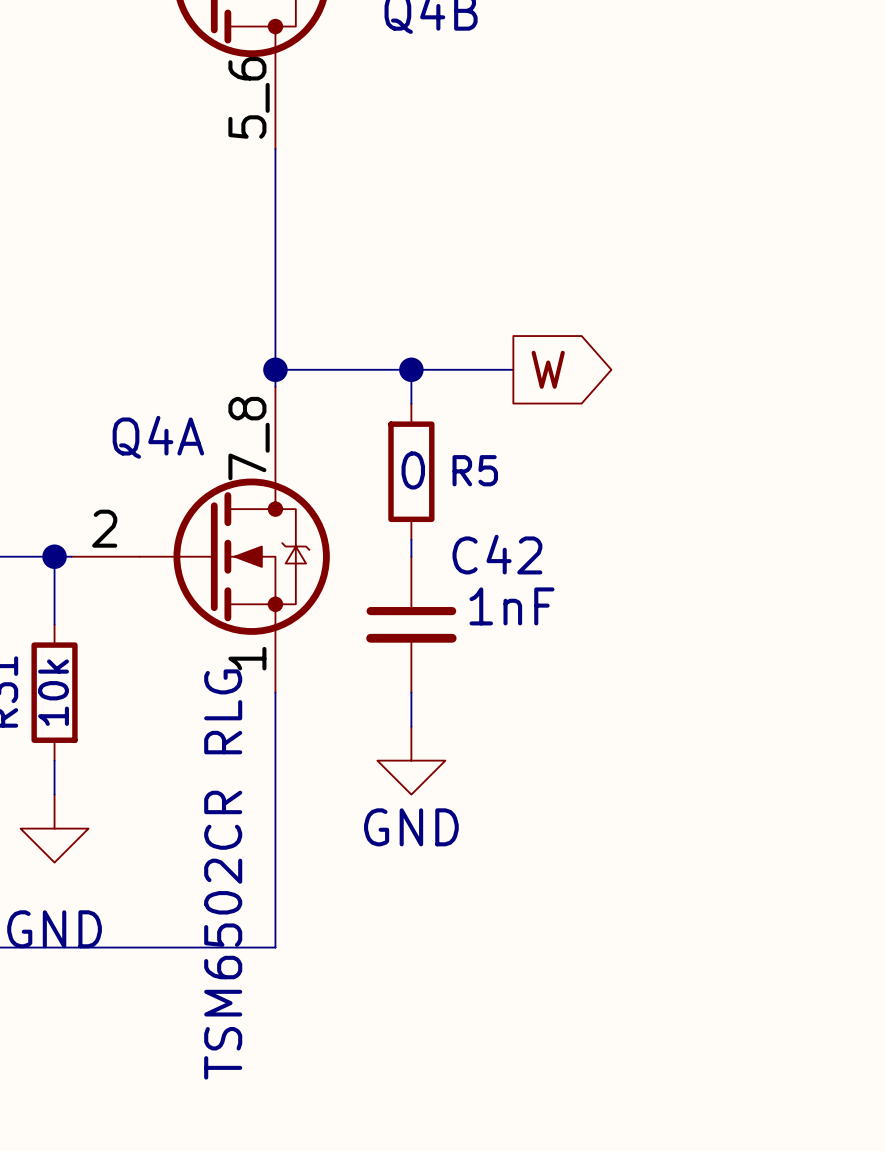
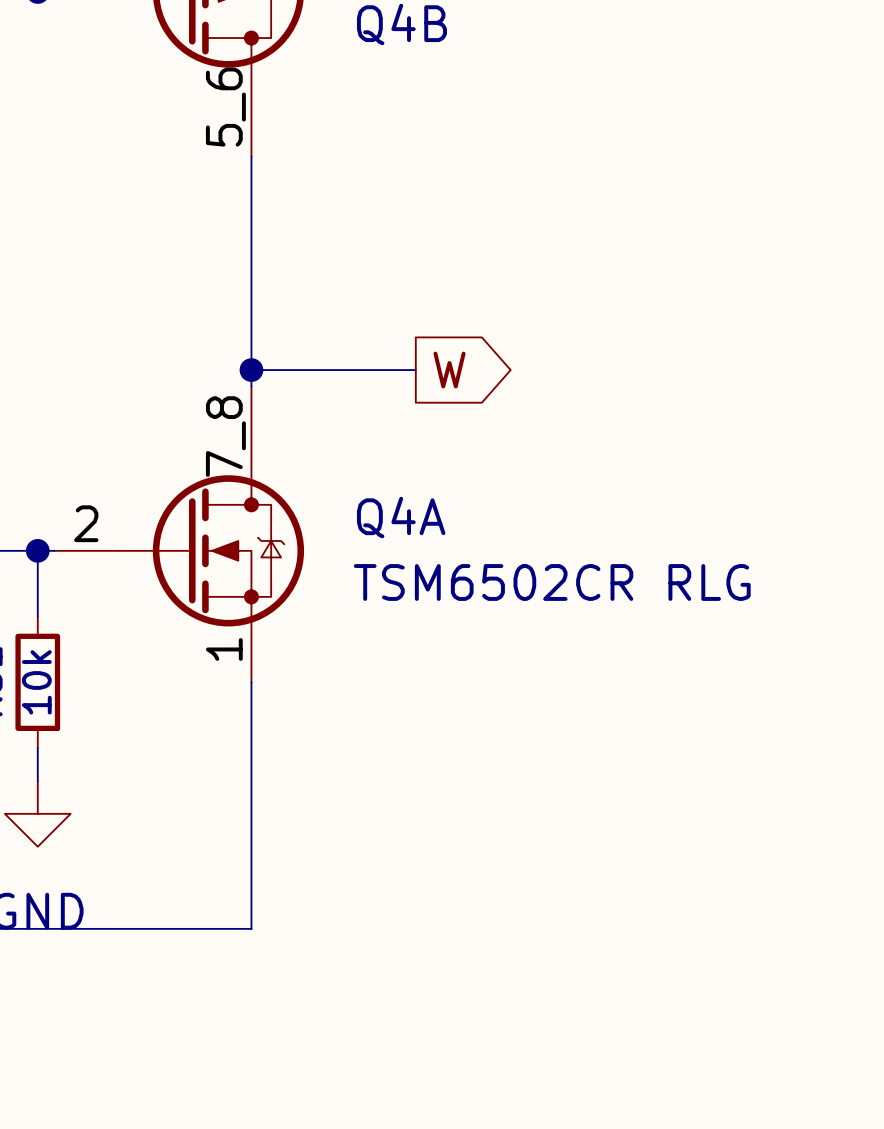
wire: (411, 369) (411, 403) -> none
junction: (411, 369) -> none
wire: (445, 369) (513, 369) -> none
global label position: W (548, 369) -> W (449, 370)
Q4A name position: Q4A (158, 437) -> Q4A (401, 517)
R5: 0 (411, 471) -> none
wire: (411, 539) (411, 556) -> none
C42: 1nF (411, 624) -> none
wire: (411, 692) (411, 726) -> none
power symbol: GND (411, 760) -> none
Q4A value rotation: 0° (223, 874) -> 90° clockwise (552, 582)

